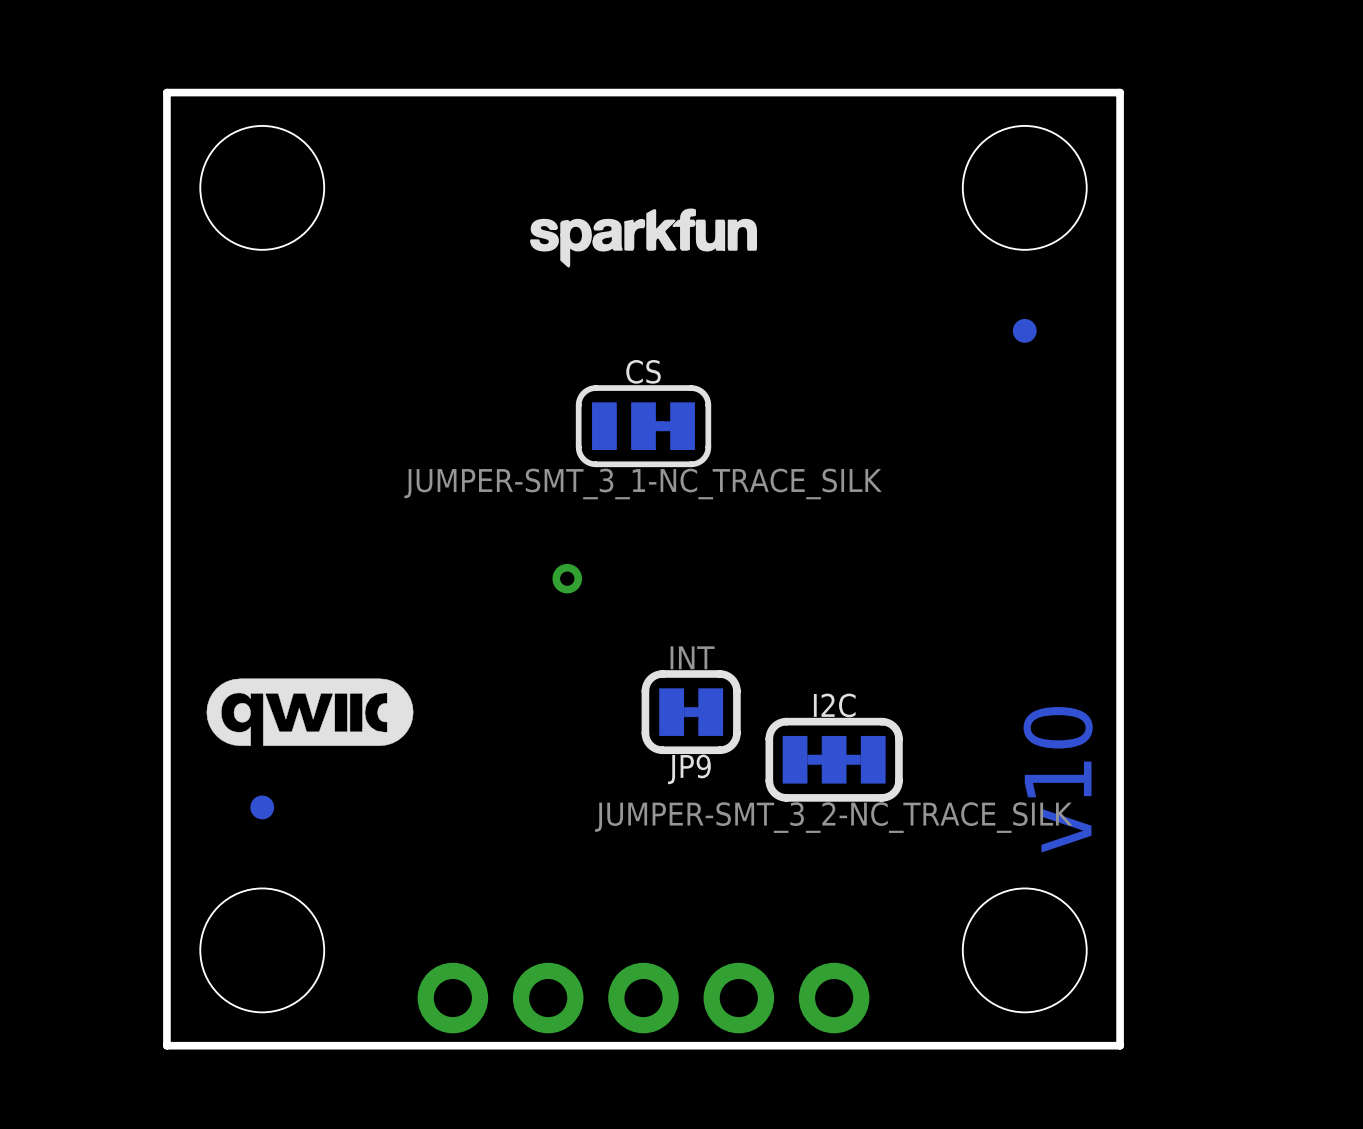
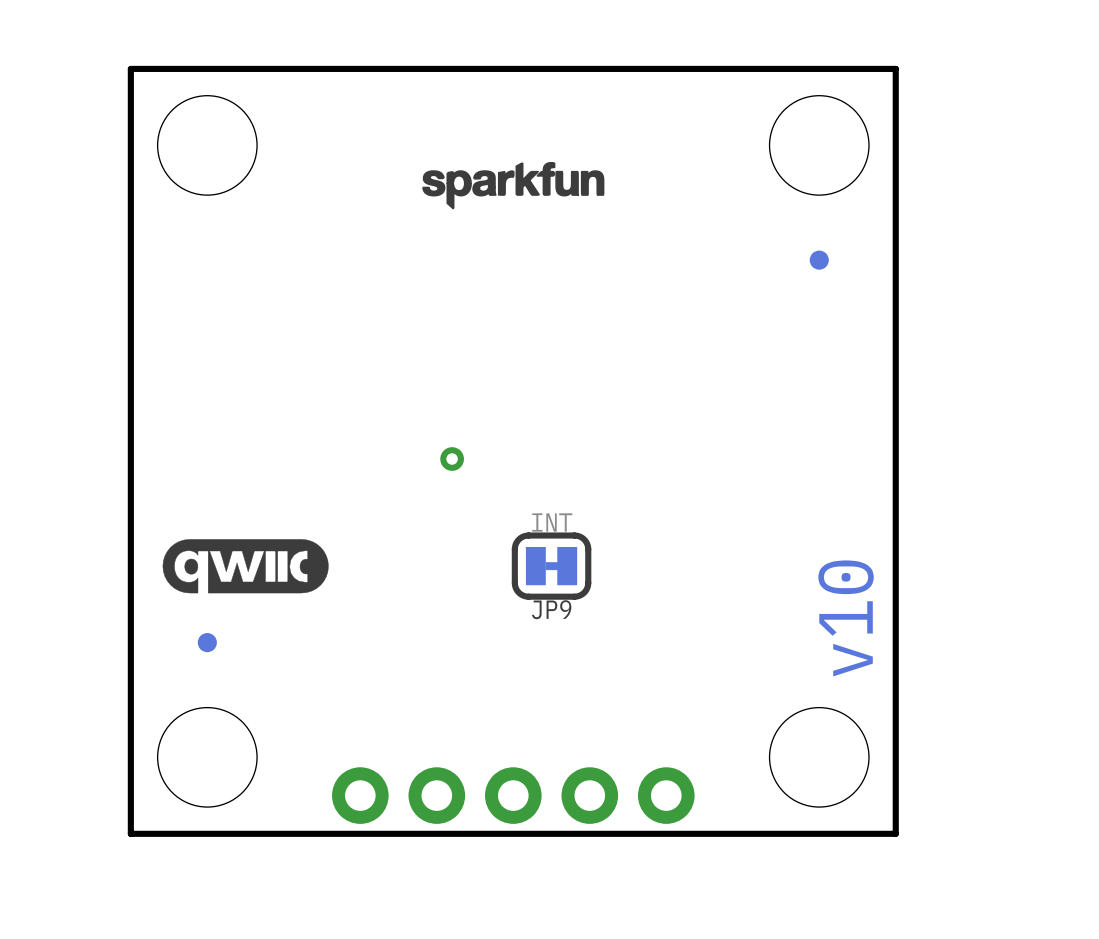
CS: JUMPER-SMT_3_1-NC_TRACE_SILK (643, 426) -> none
I2C: JUMPER-SMT_3_2-NC_TRACE_SILK (834, 759) -> none

